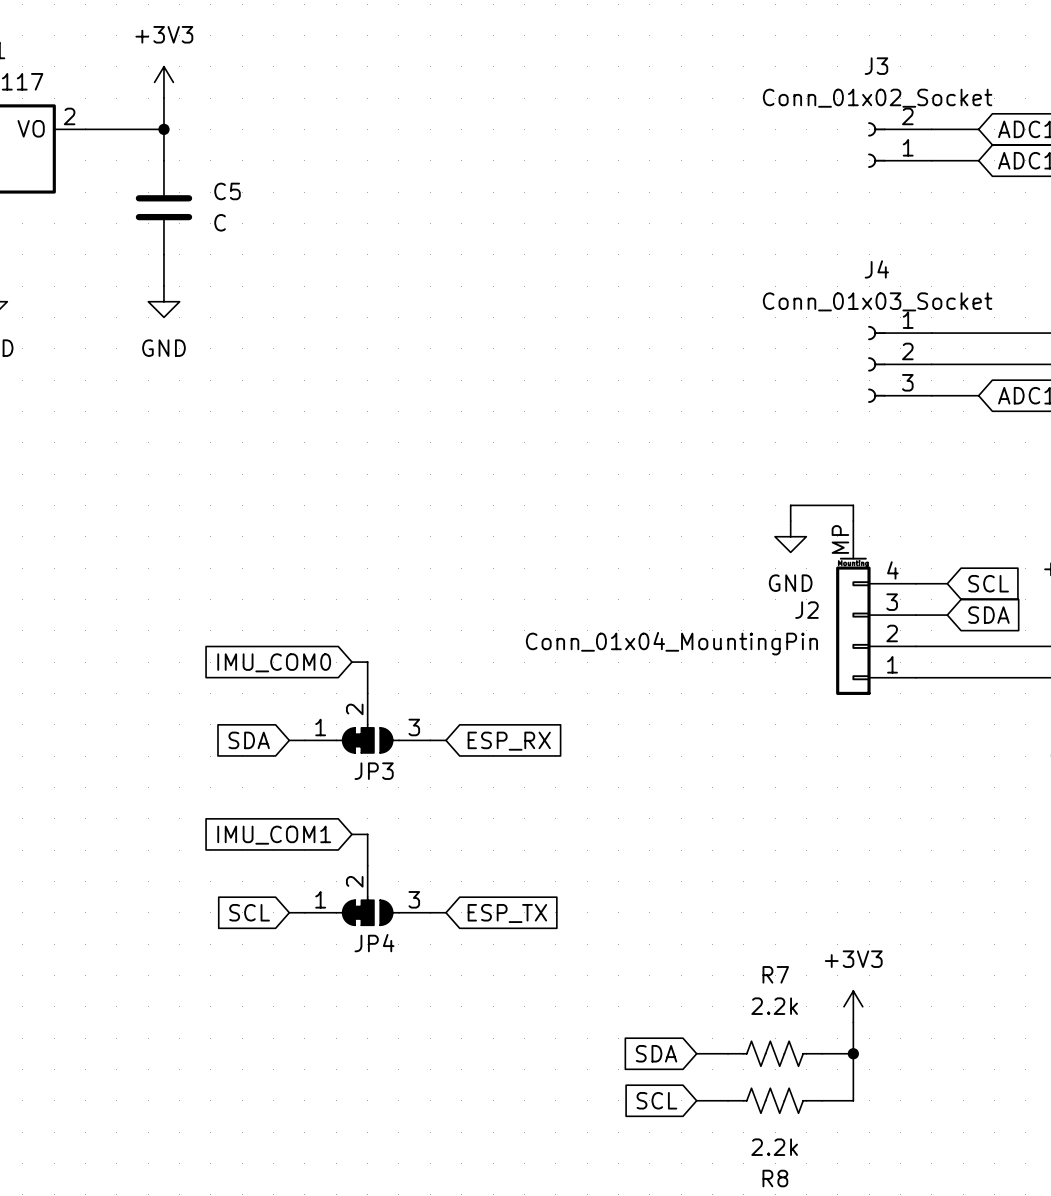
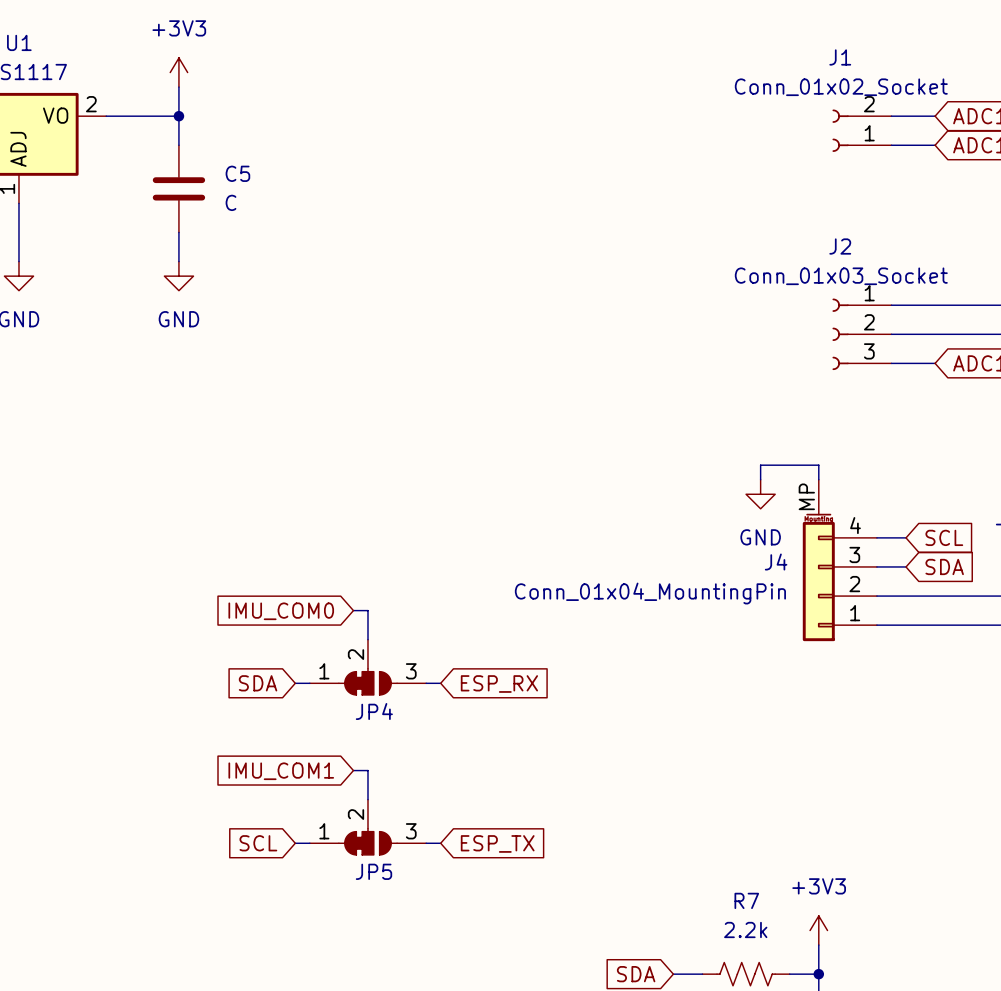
J3 name: J3 (876, 66) -> J1 (840, 57)
J4 name: J4 (876, 269) -> J2 (840, 246)
J2 name: J2 (806, 610) -> J4 (776, 562)
JP3 name: JP3 (374, 771) -> JP4 (374, 711)
JP4 name: JP4 (374, 943) -> JP5 (373, 871)

